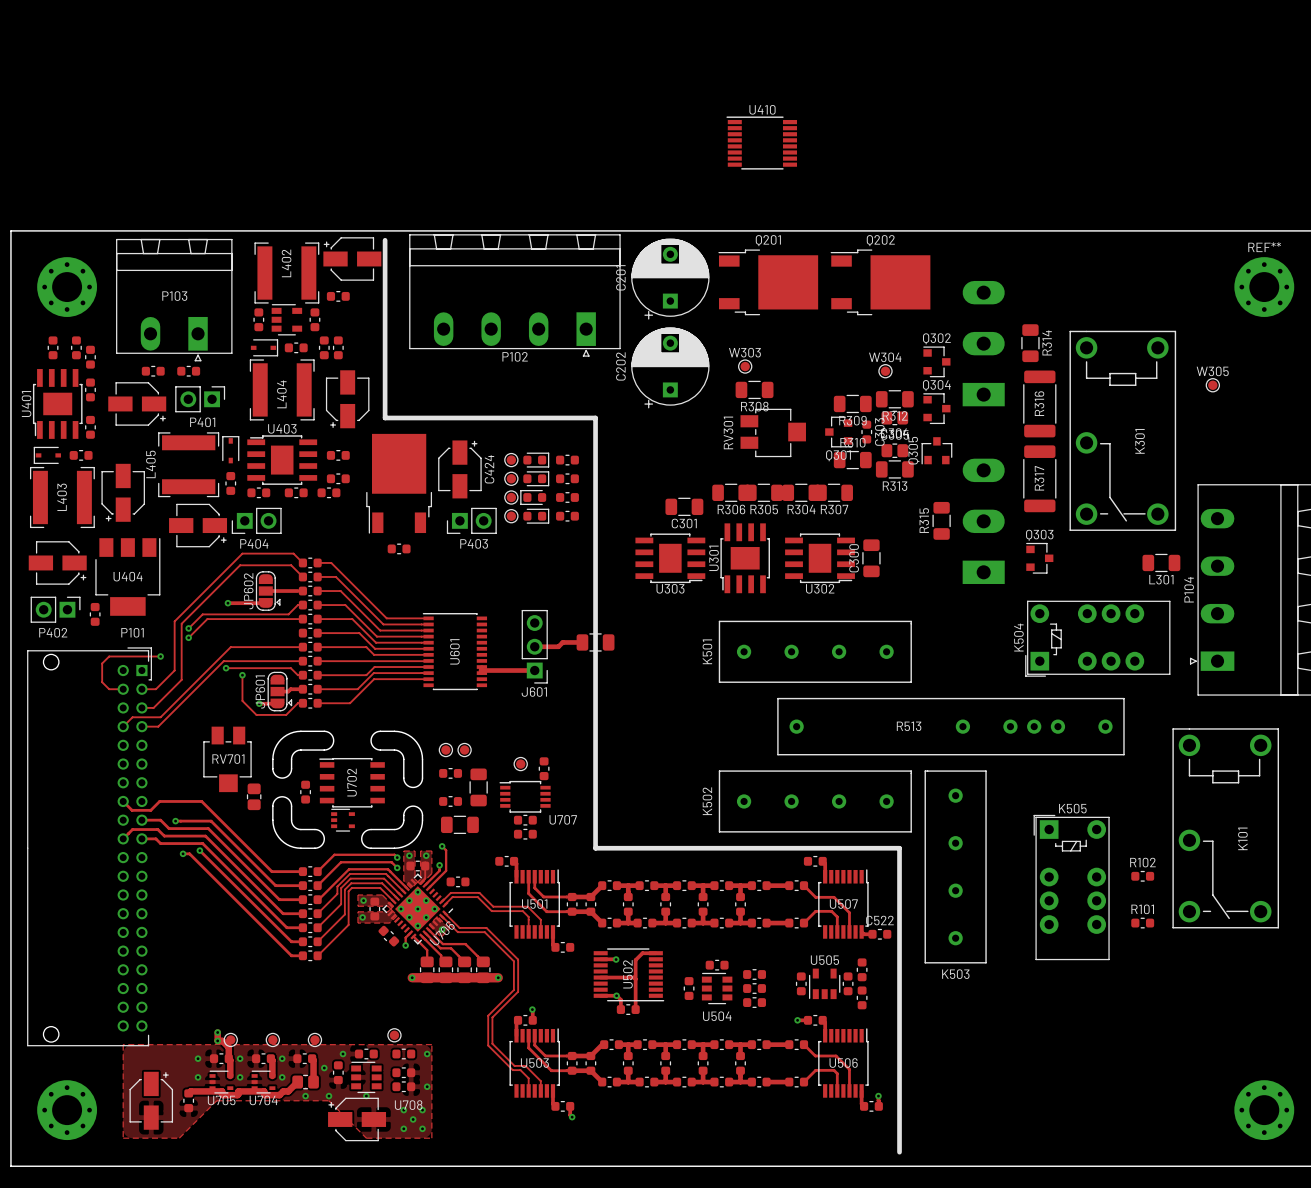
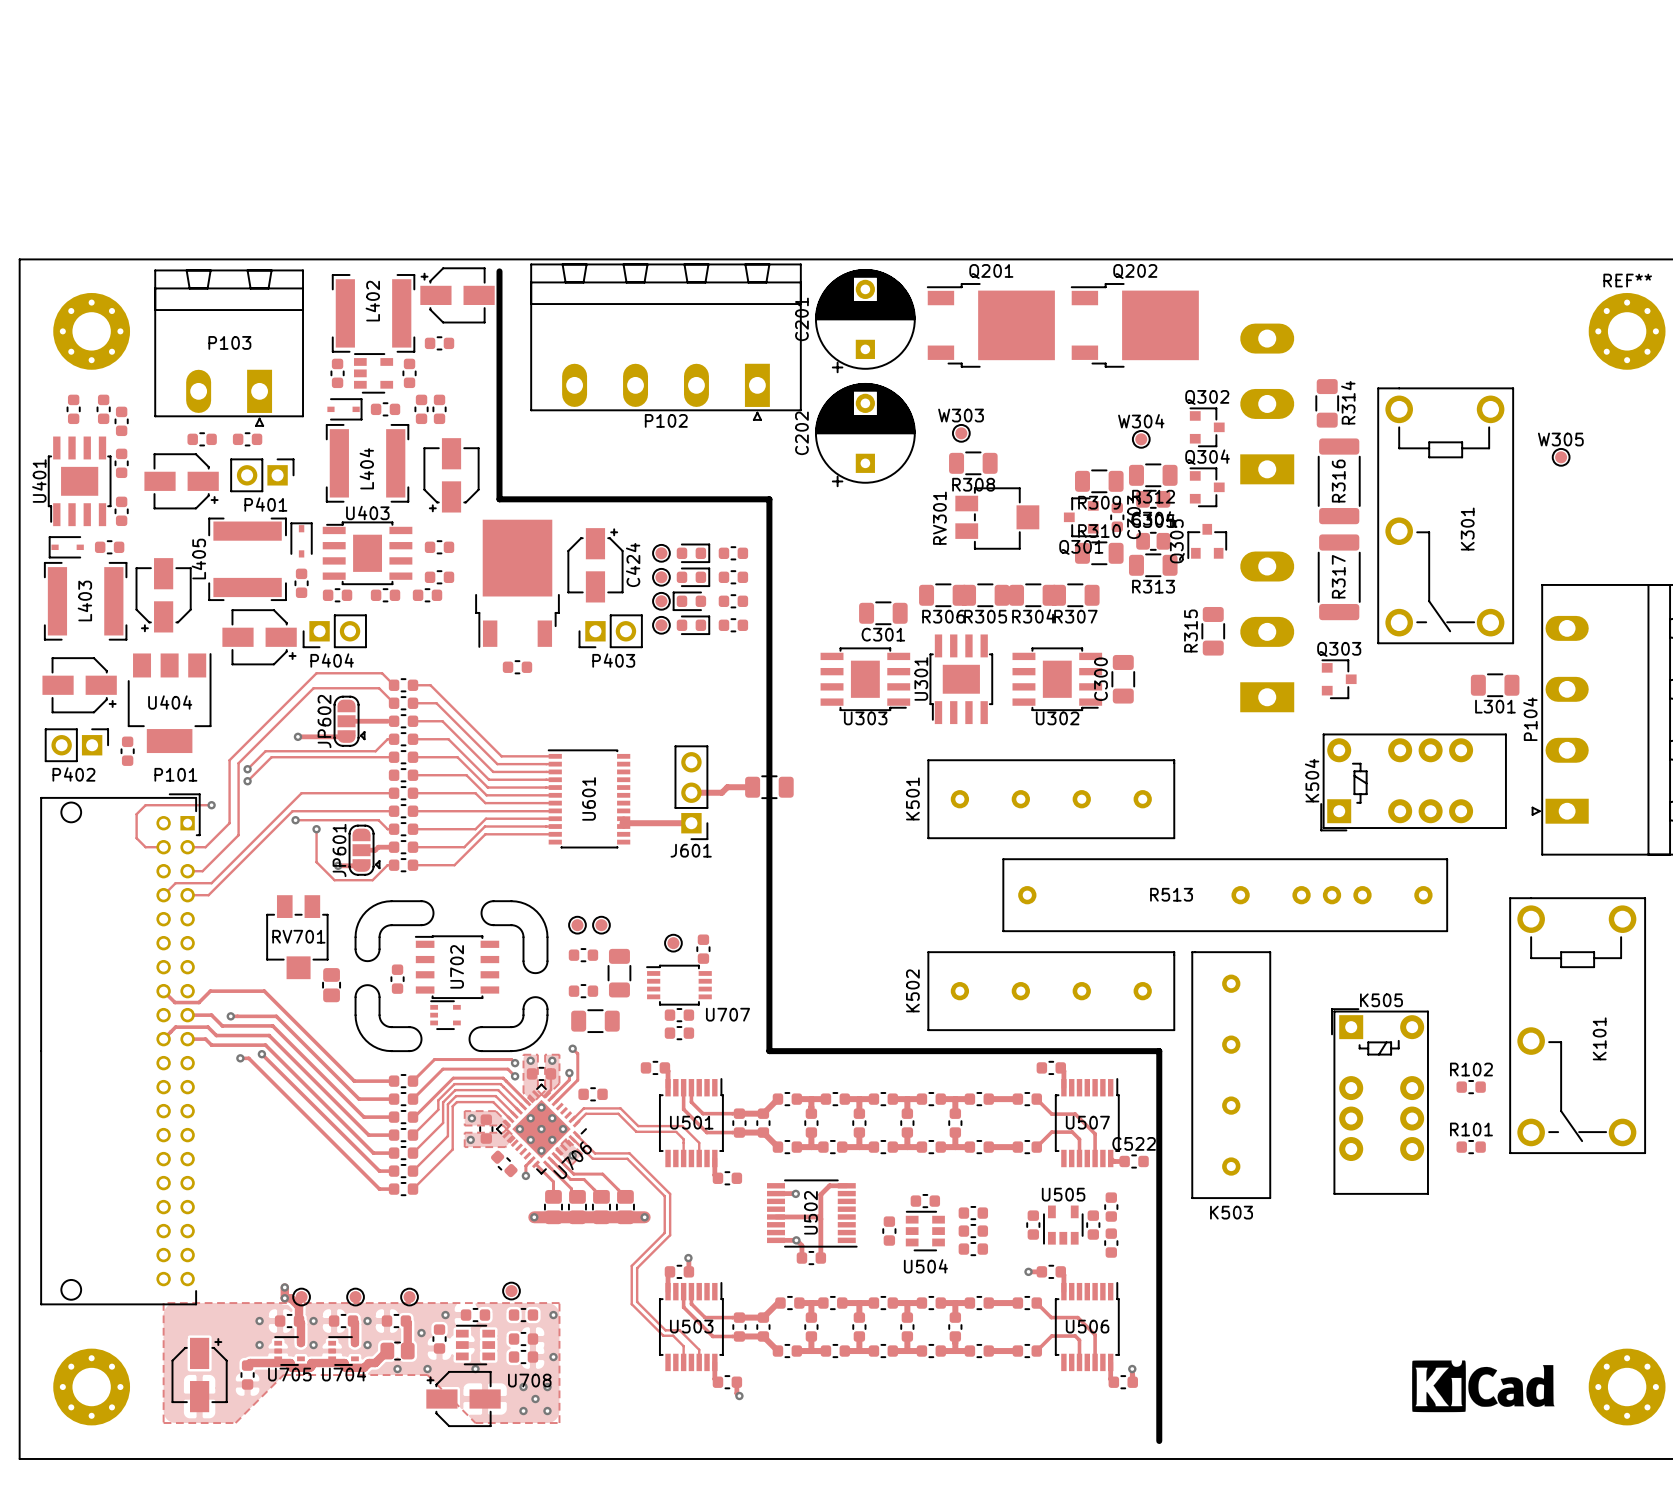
U410: (761, 143) -> none
drawing: none -> [1412, 1360, 1555, 1413]

